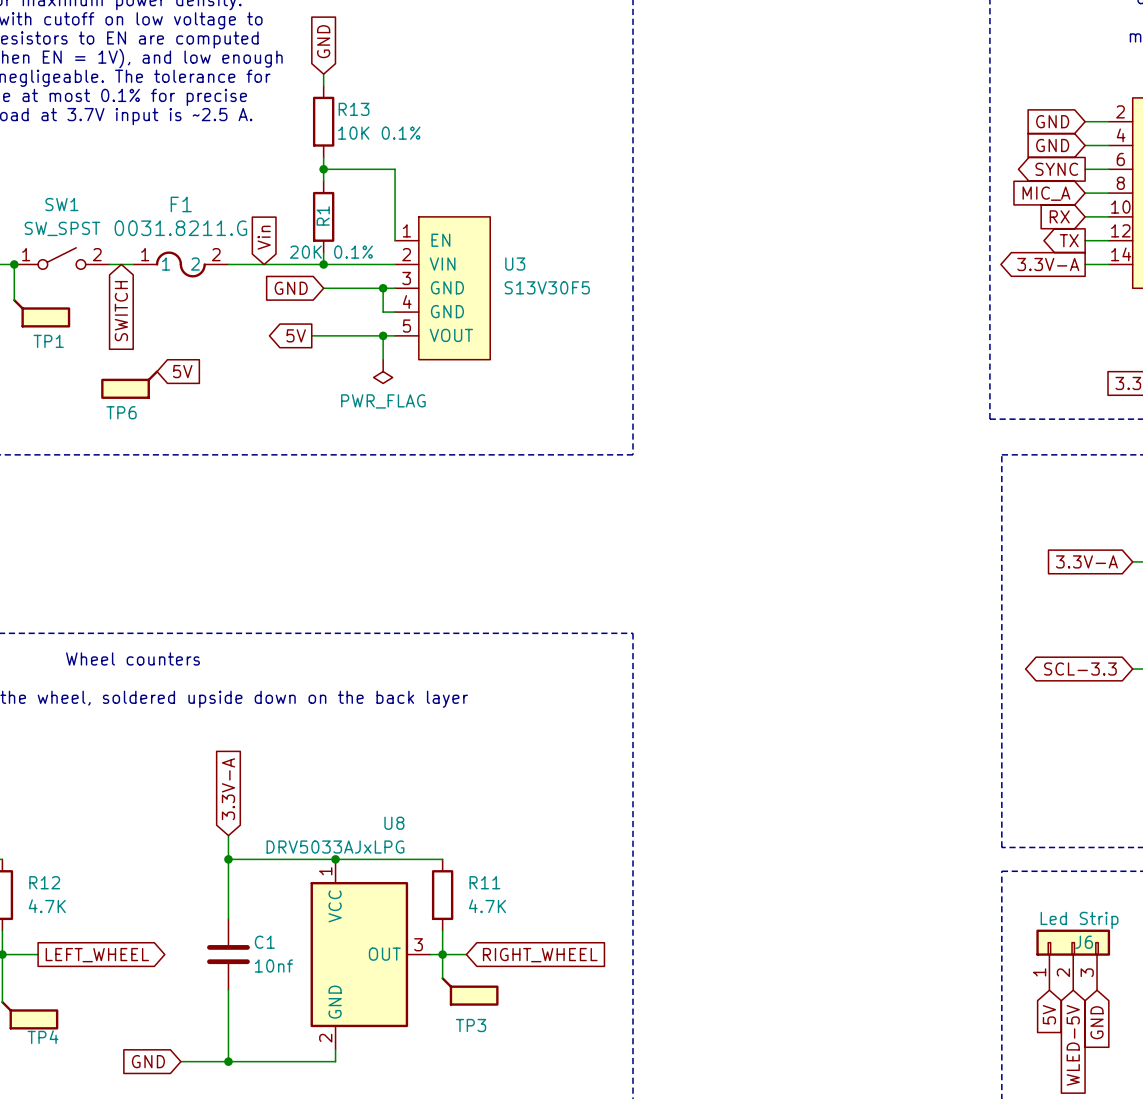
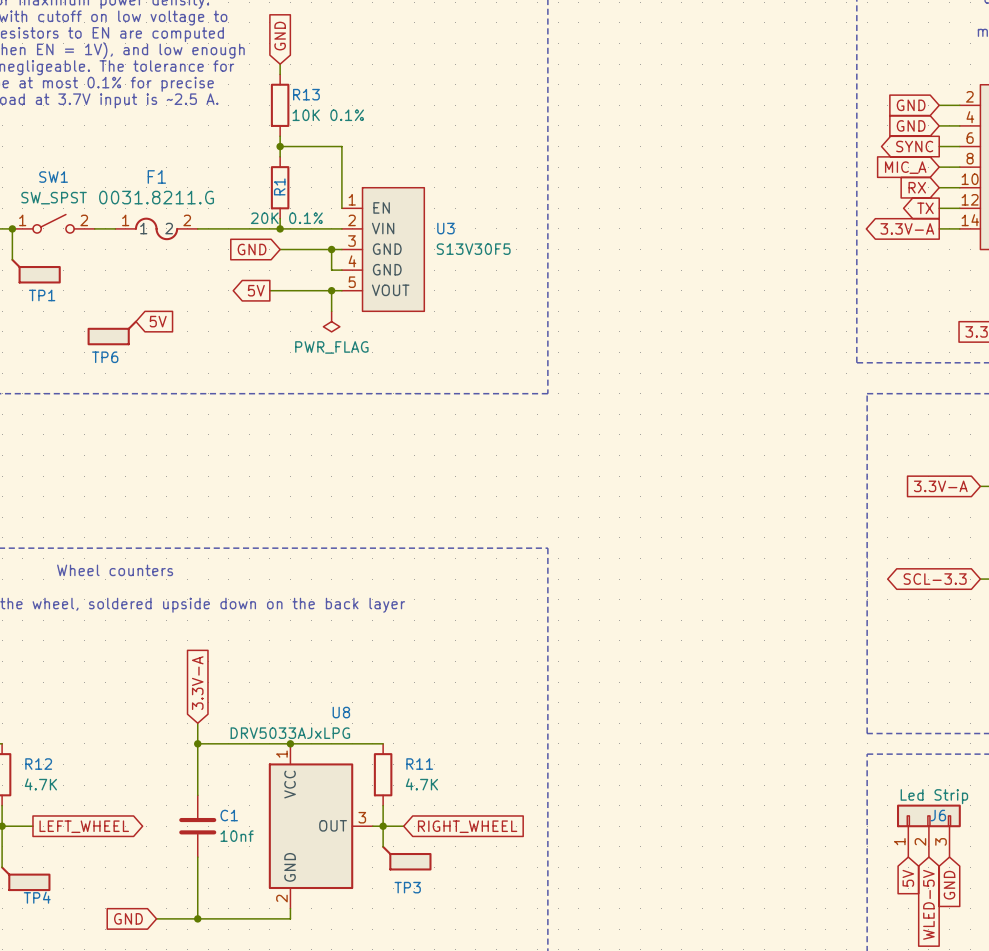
global label: Vin (264, 237) -> none
global label: SWITCH (121, 311) -> none

